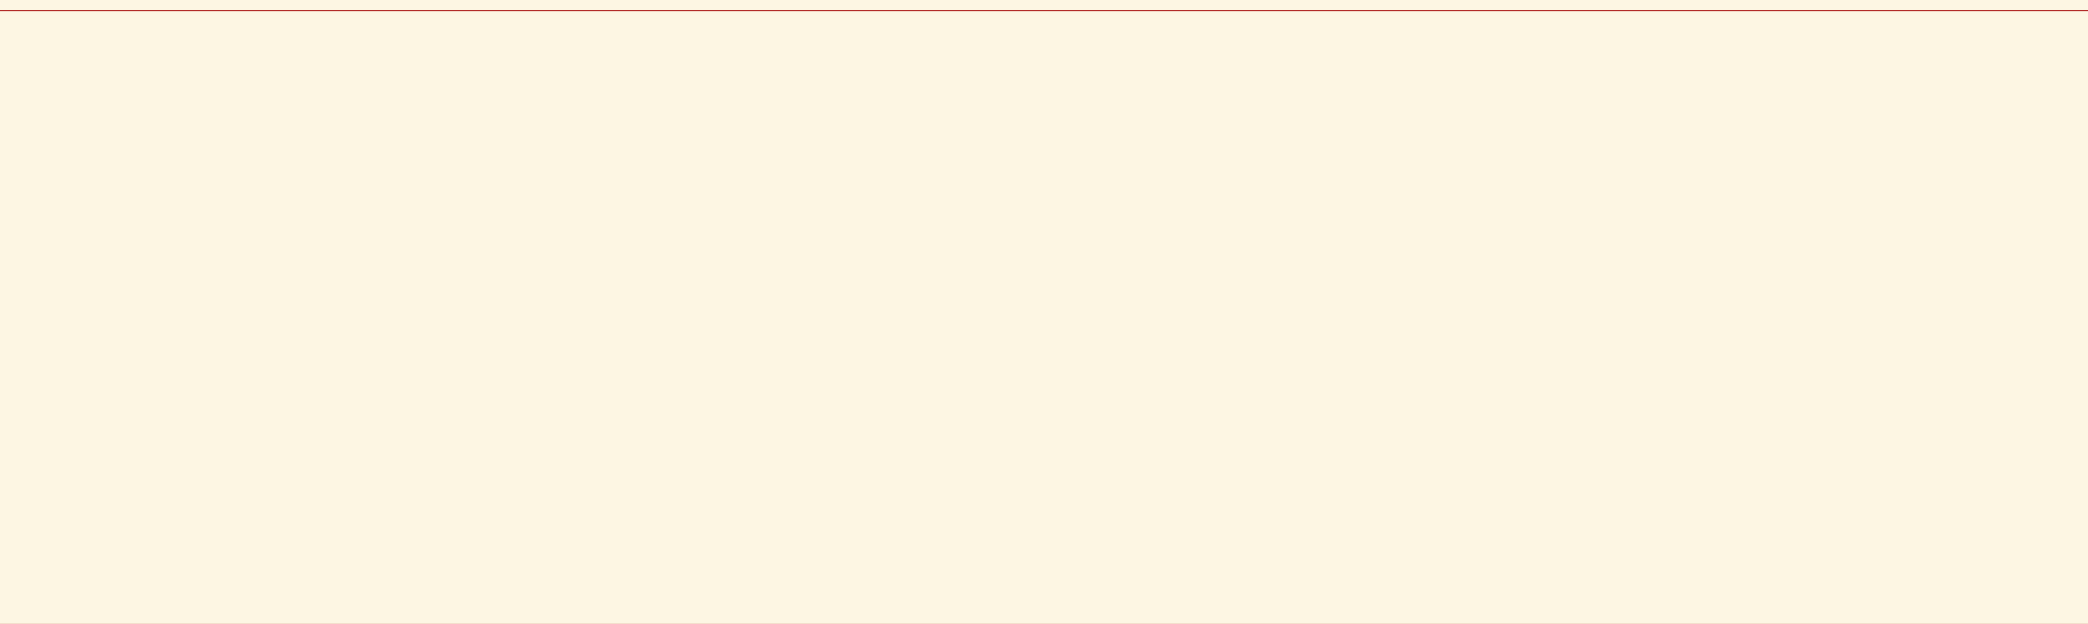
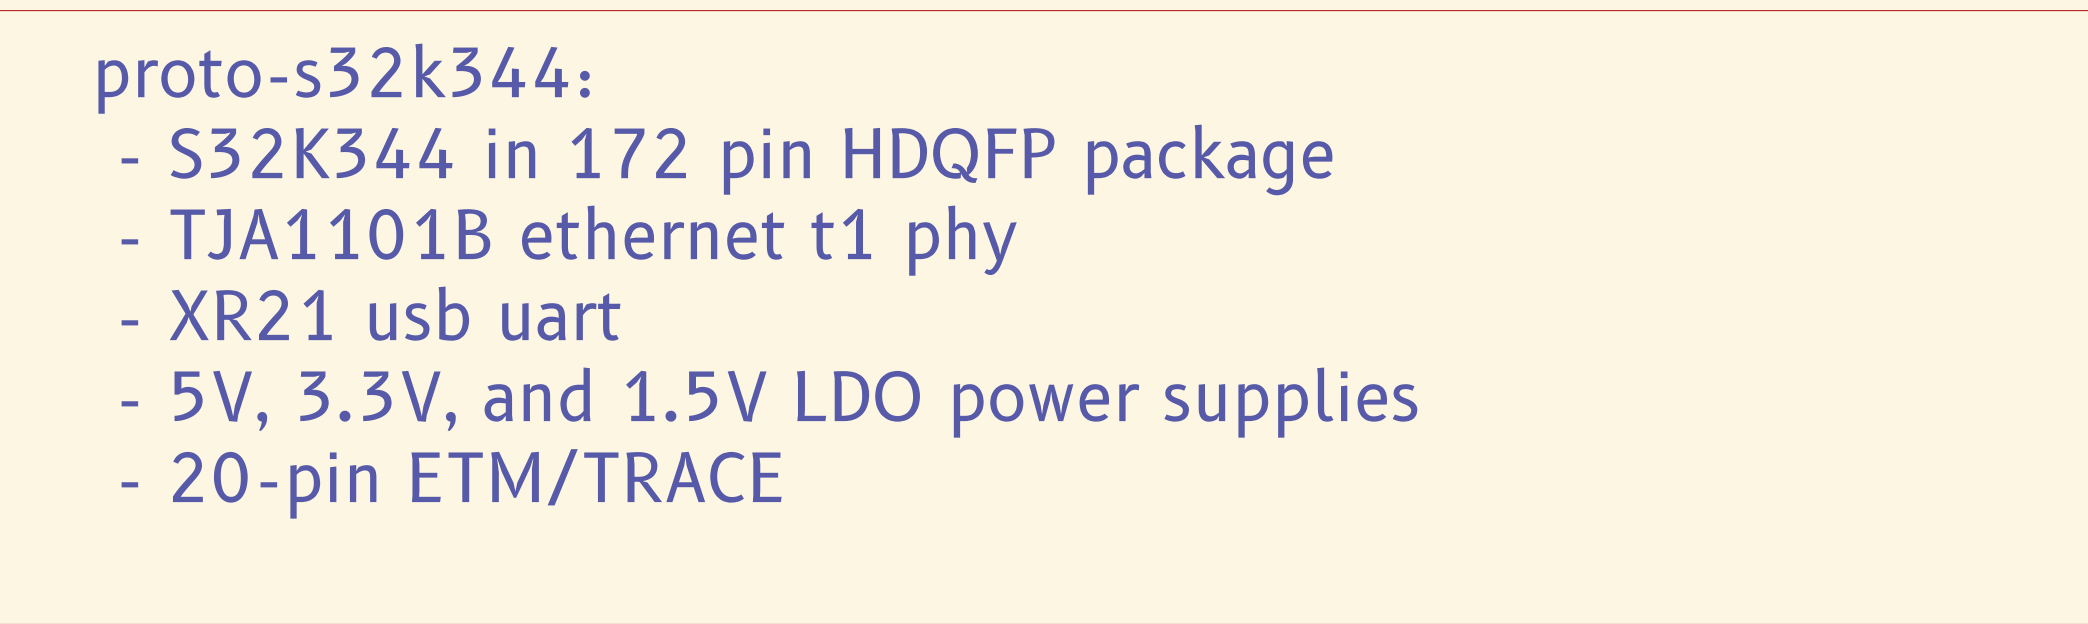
text: none -> proto-s32k344: (344, 78)
text: none -> - S32K344 in 172 pin HDQFP package (727, 159)
text: none -> - TJA1101B ethernet t1 phy (569, 240)
text: none -> - XR21 usb uart (371, 313)
text: none -> - 5V, 3.3V, and 1.5V LDO power supplies (769, 402)
text: none -> - 20-pin ETM/TRACE (451, 483)

